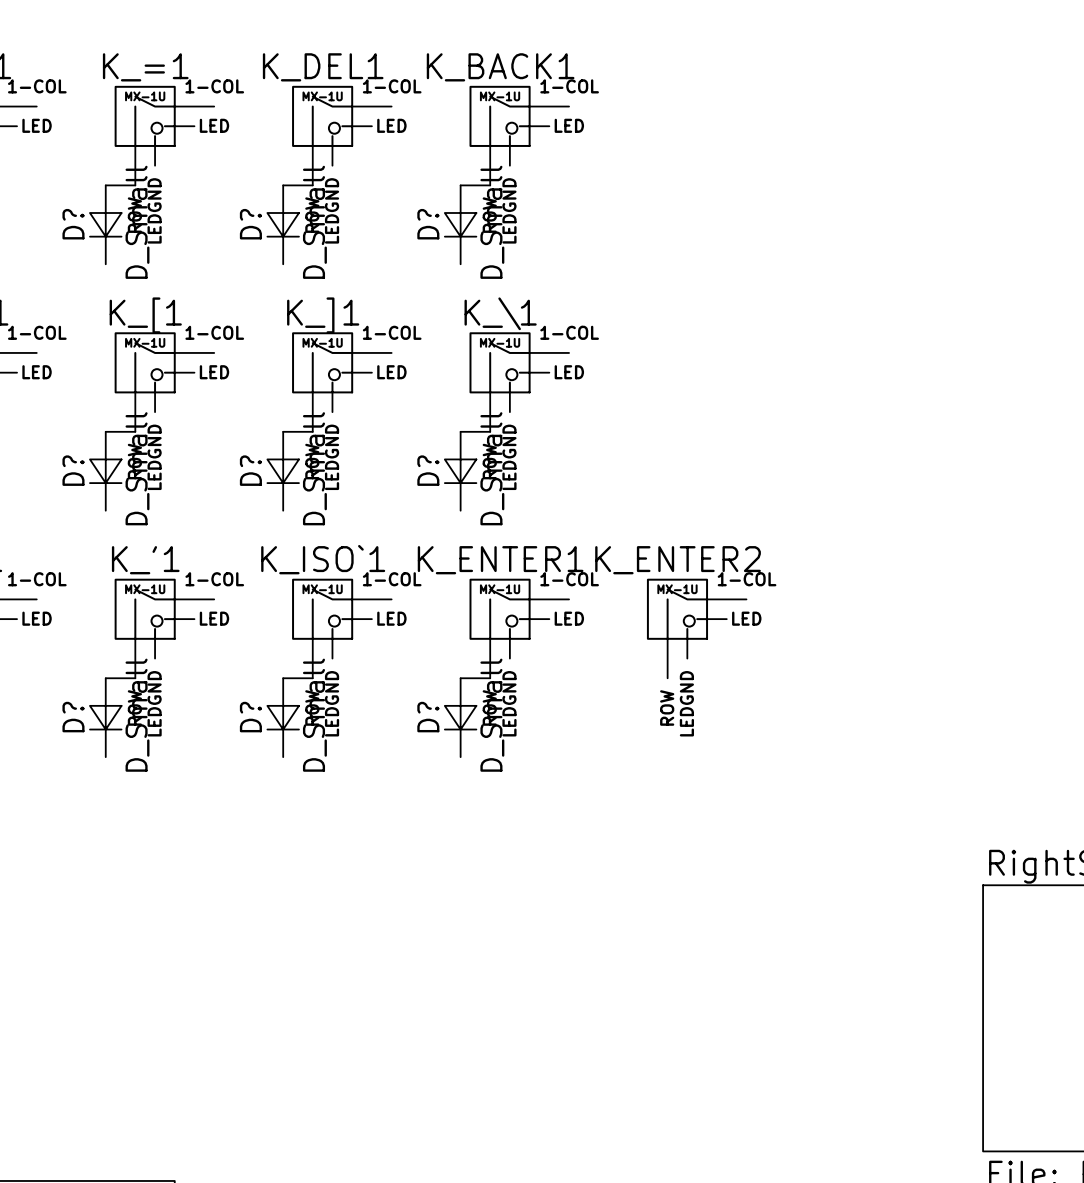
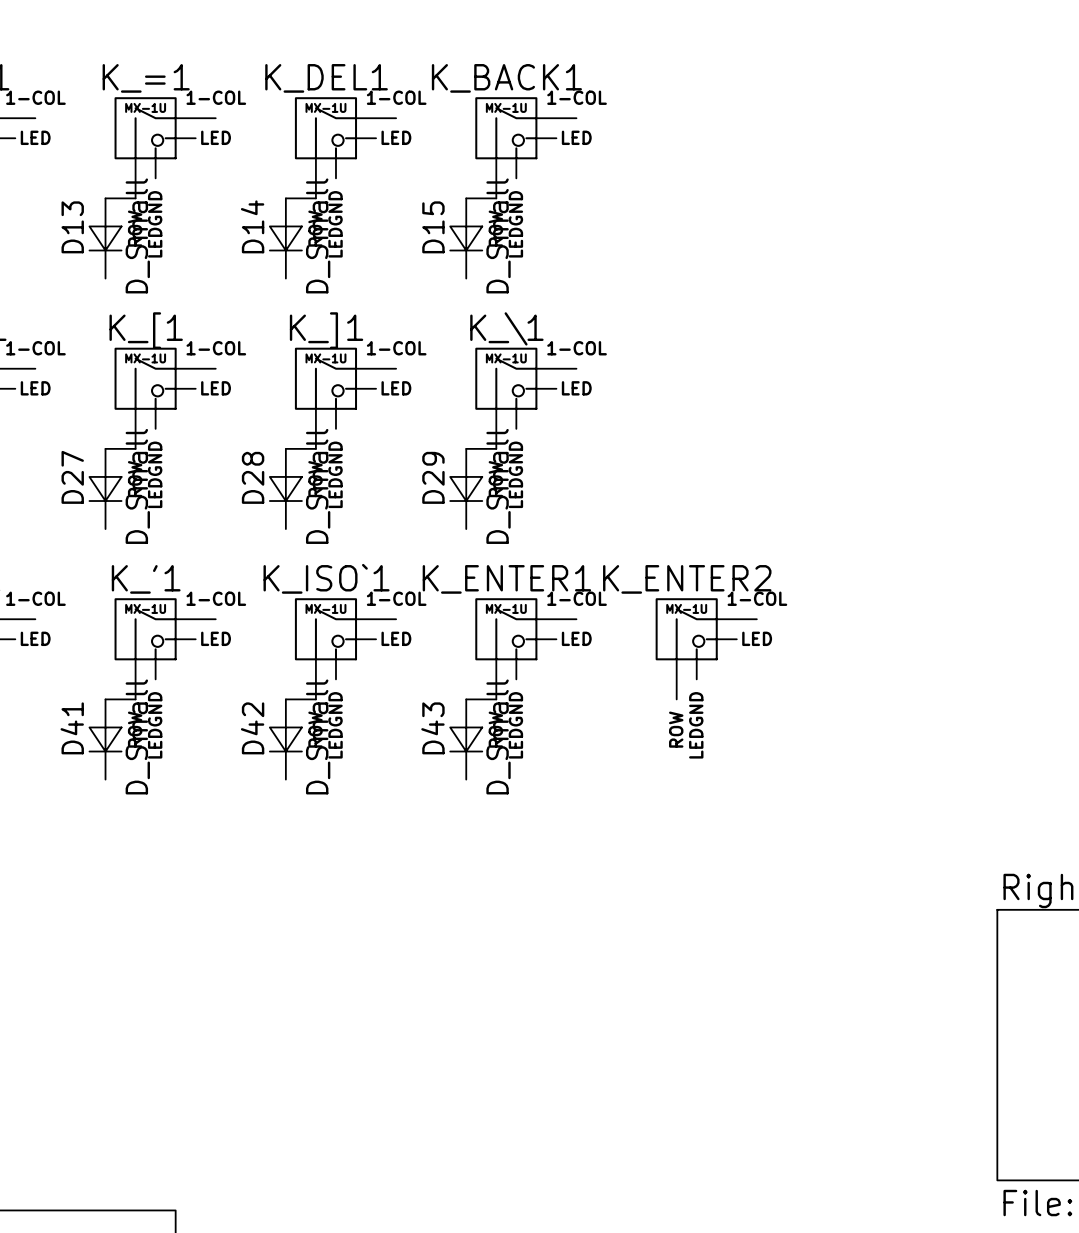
D? name: D? (73, 224) -> D13 (72, 227)
D? name: D? (250, 224) -> D14 (252, 226)
D? name: D? (428, 224) -> D15 (433, 227)
D? name: D? (73, 470) -> D27 (72, 477)
D? name: D? (250, 470) -> D28 (253, 477)
D? name: D? (428, 470) -> D29 (433, 477)
D? name: D? (73, 717) -> D41 (72, 728)
D? name: D? (250, 717) -> D42 (252, 728)
D? name: D? (428, 717) -> D43 (432, 728)

